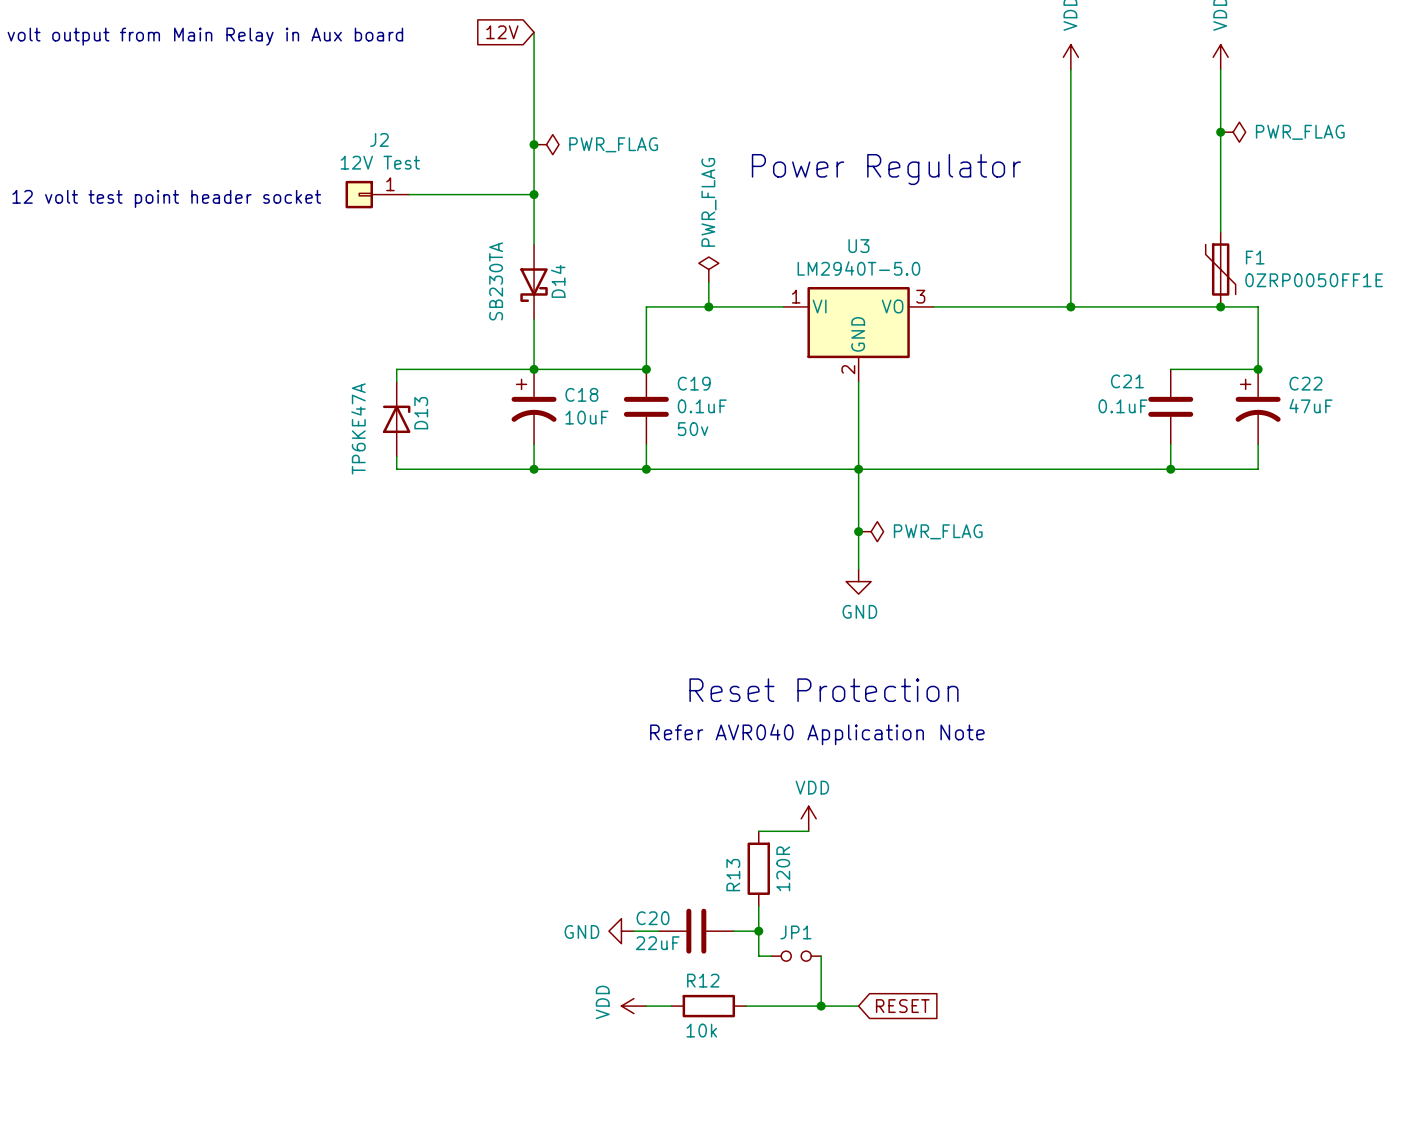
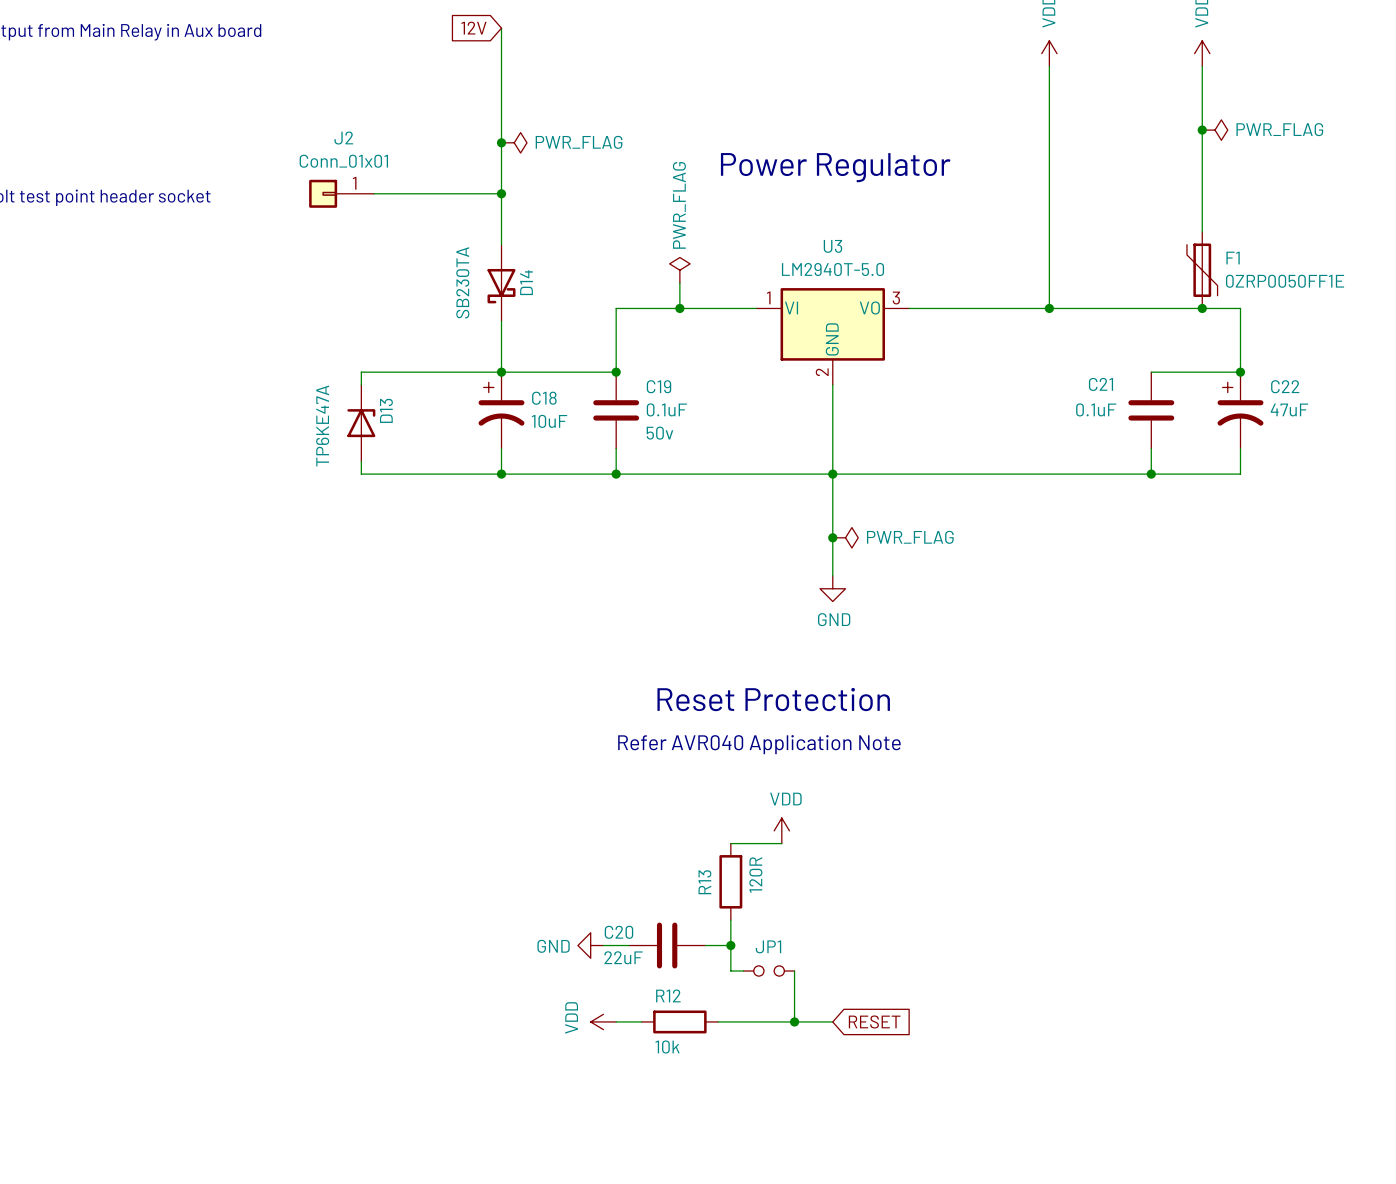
J2 value: 12V Test (380, 162) -> Conn_01x01 (343, 161)

